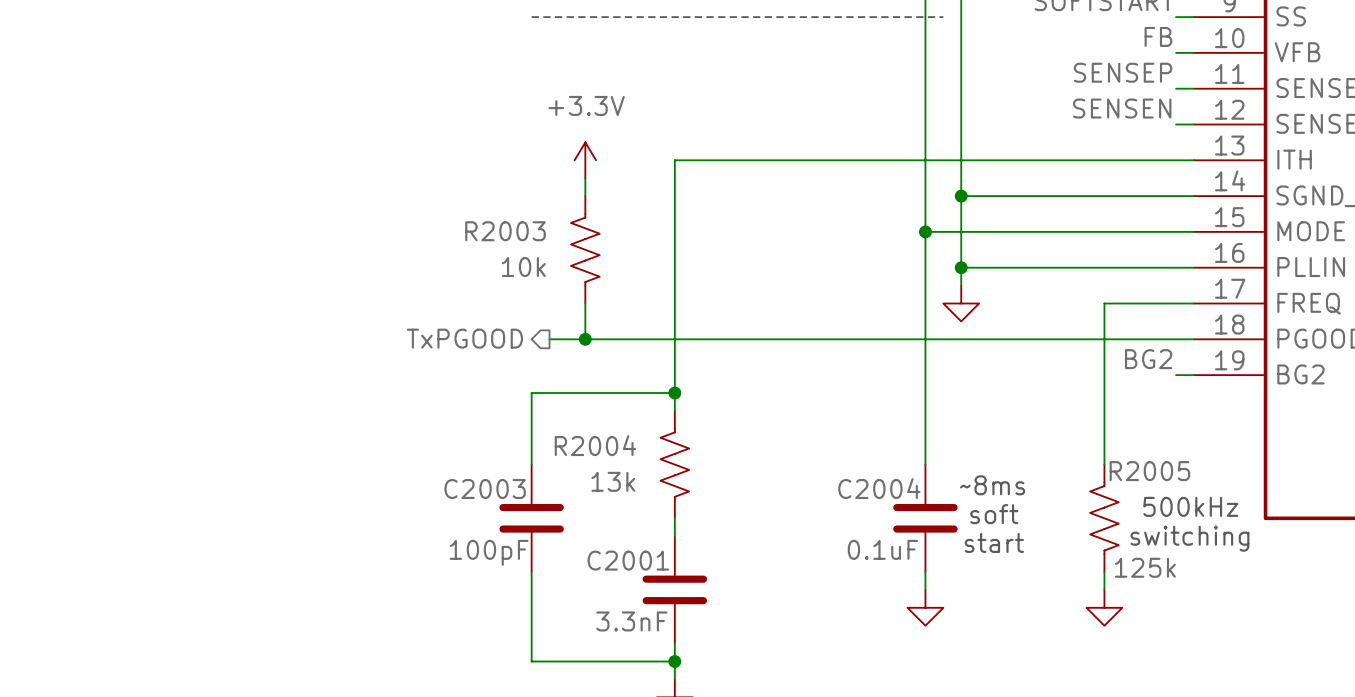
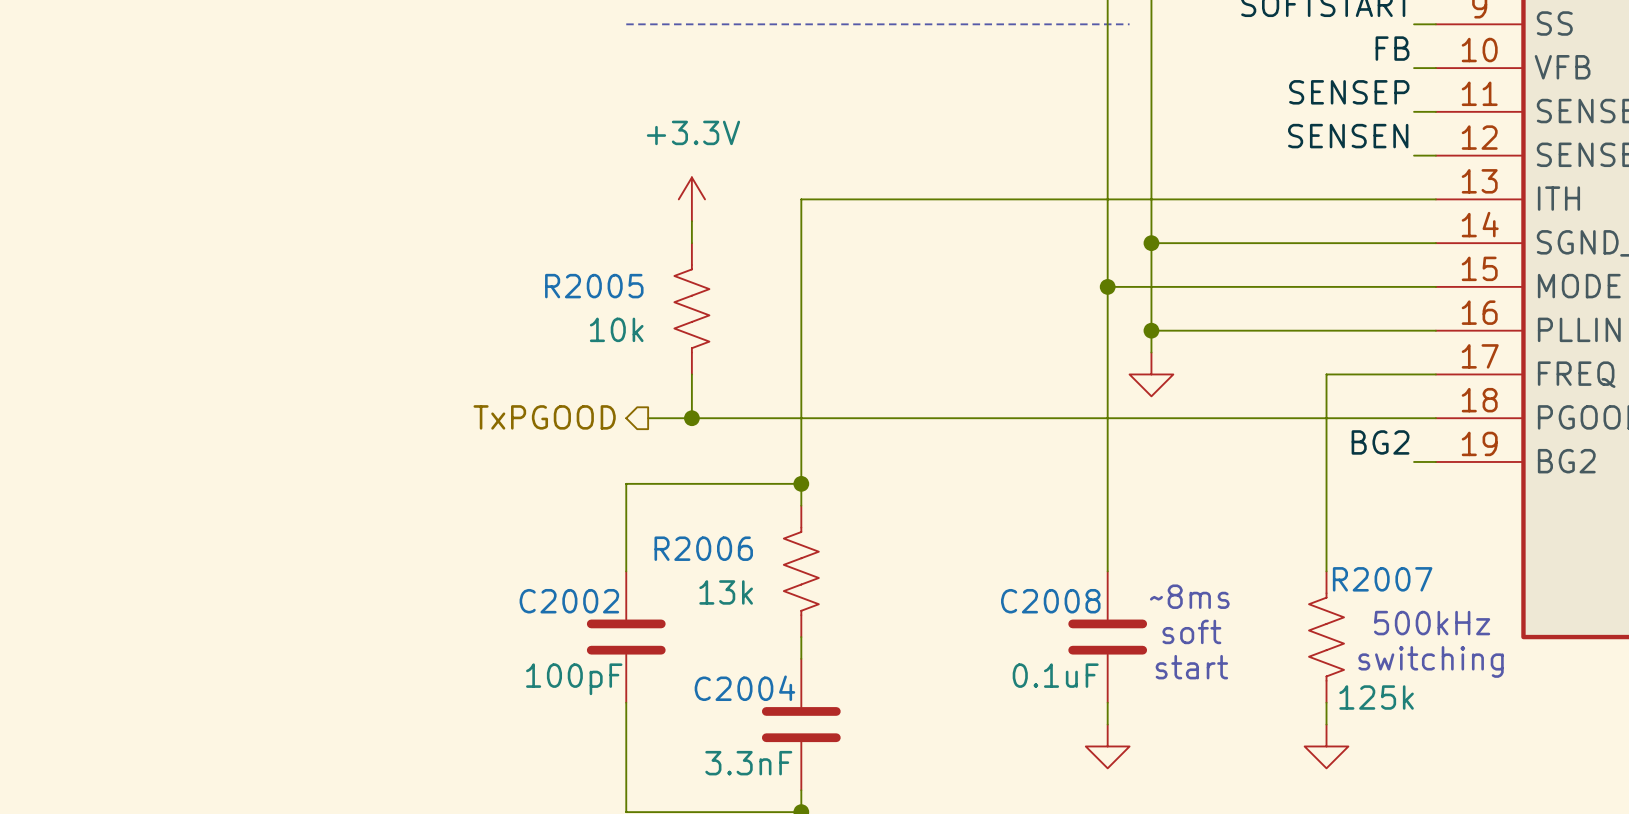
R2003 name: R2003 (505, 231) -> R2005 (594, 286)
R2004 name: R2004 (595, 445) -> R2006 (703, 548)
R2005 name: R2005 (1149, 471) -> R2007 (1382, 579)
C2004 name: C2004 (879, 488) -> C2008 (1050, 601)
C2003 name: C2003 (485, 489) -> C2002 (569, 601)
C2001 name: C2001 (628, 560) -> C2004 (744, 688)

